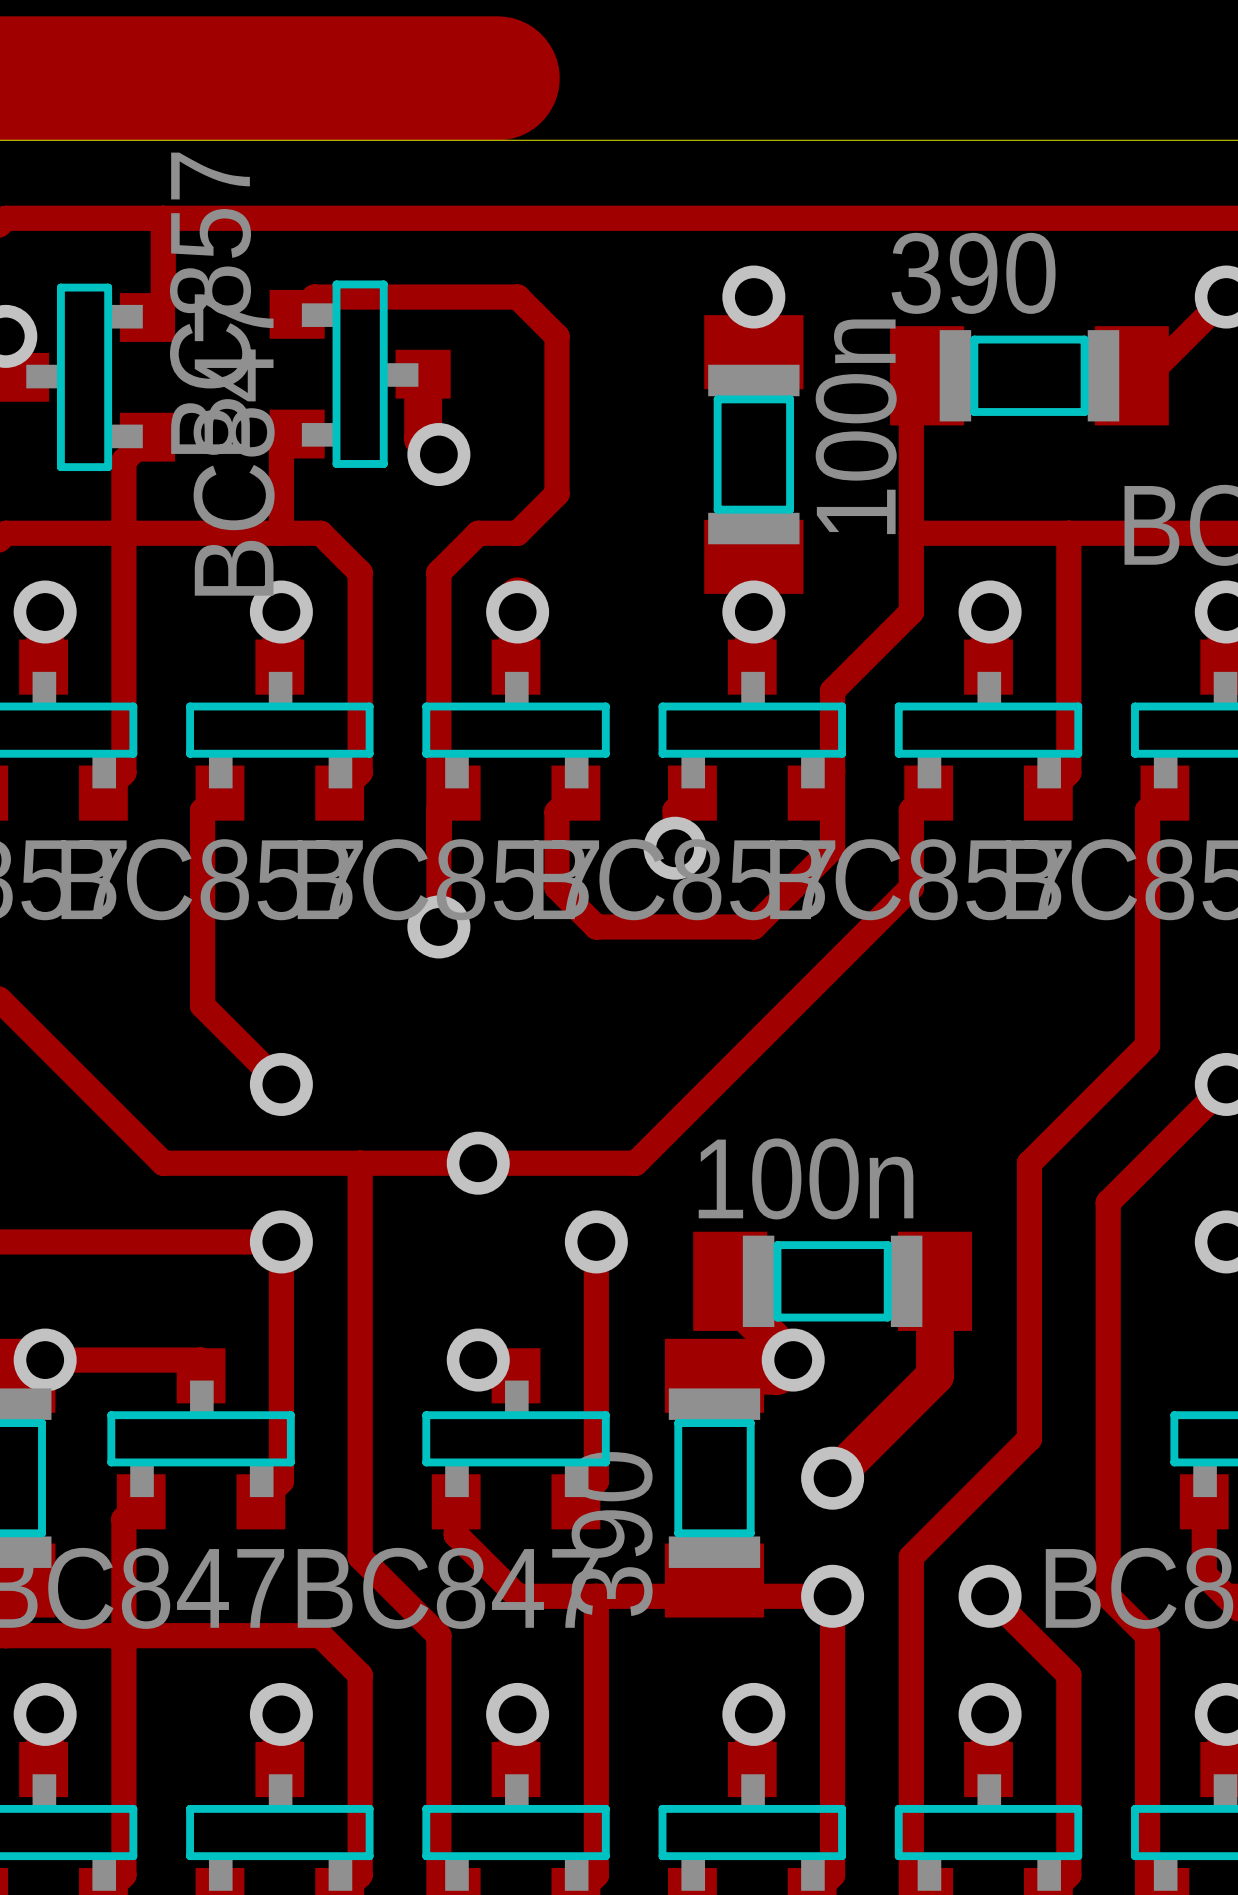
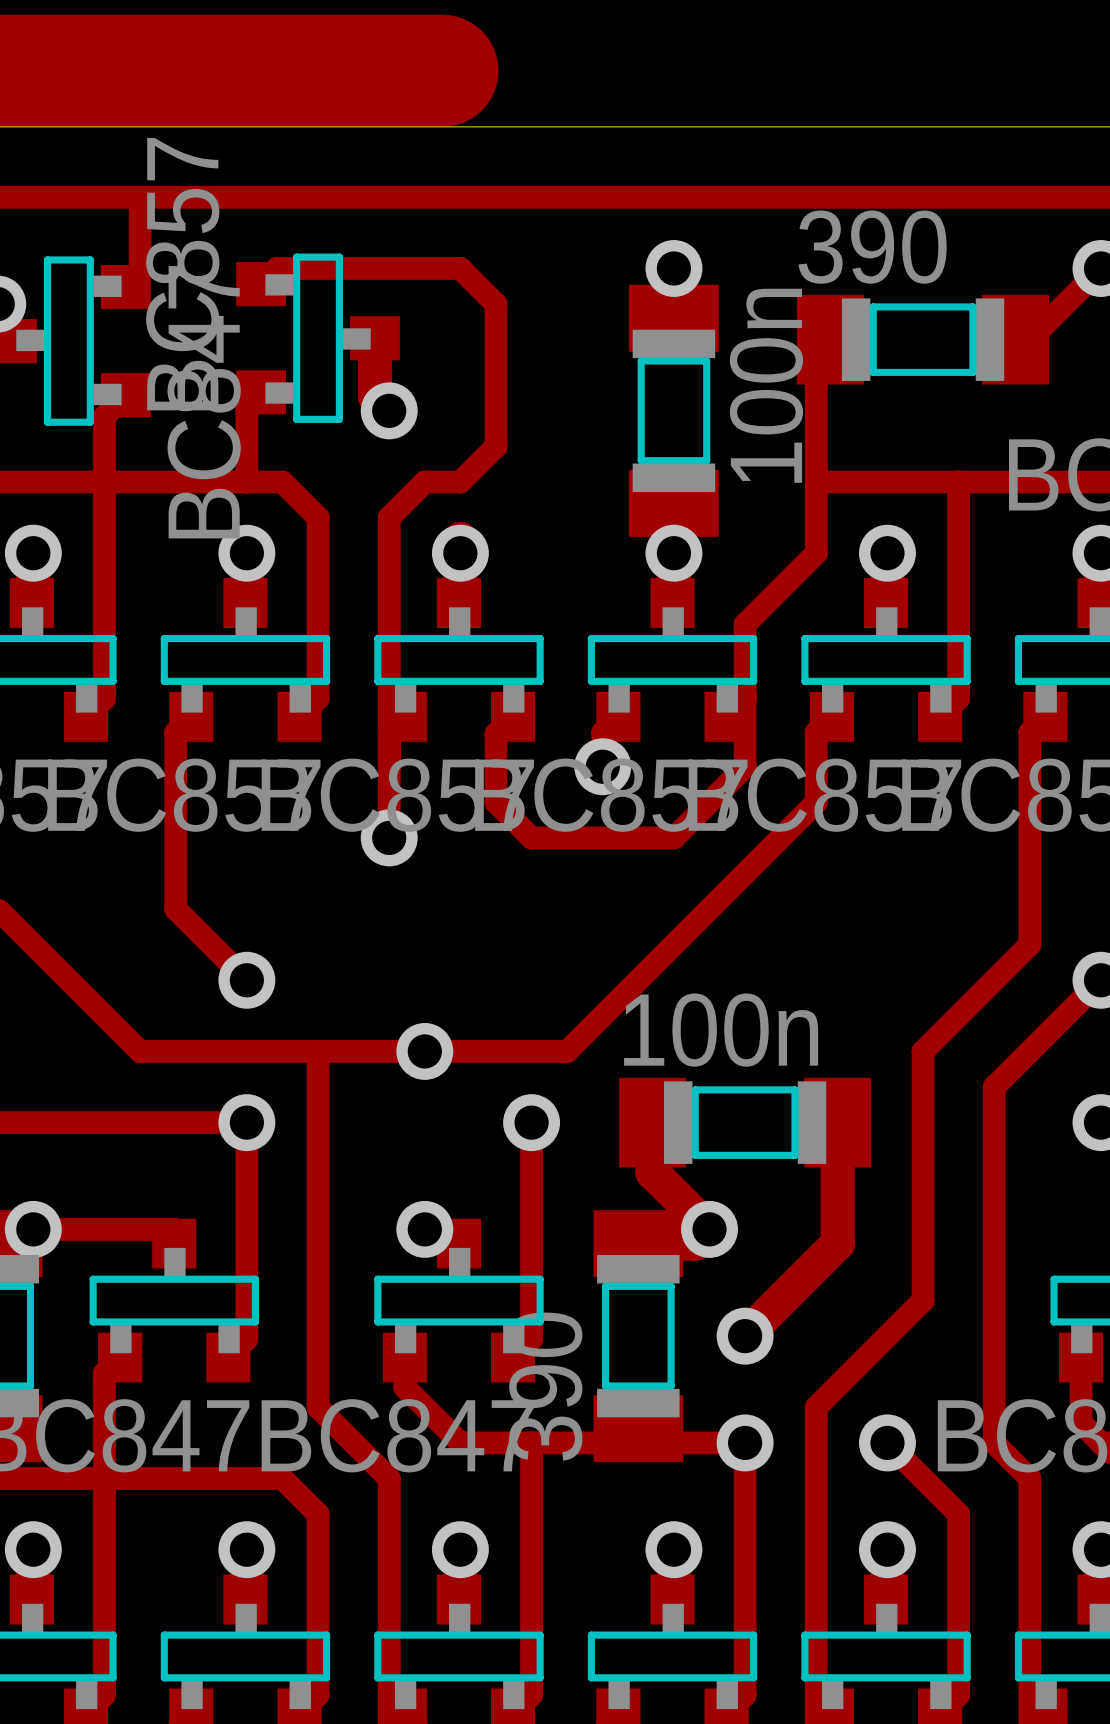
part position: (832, 1281) -> (745, 1122)

